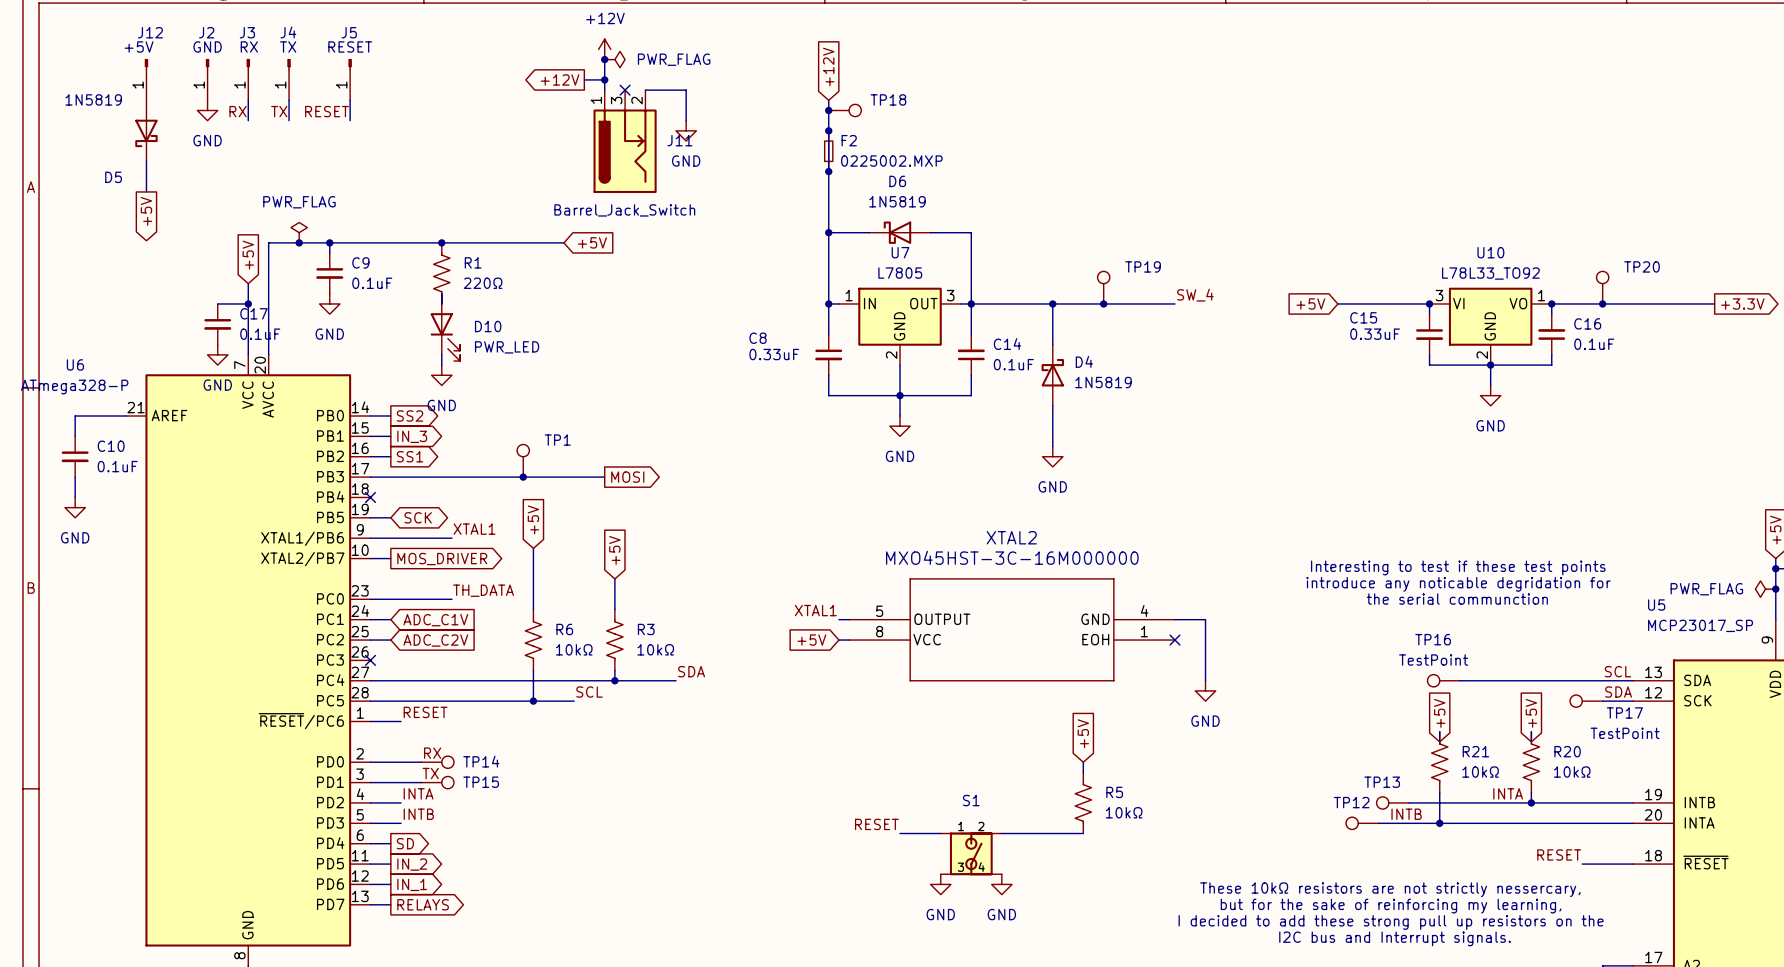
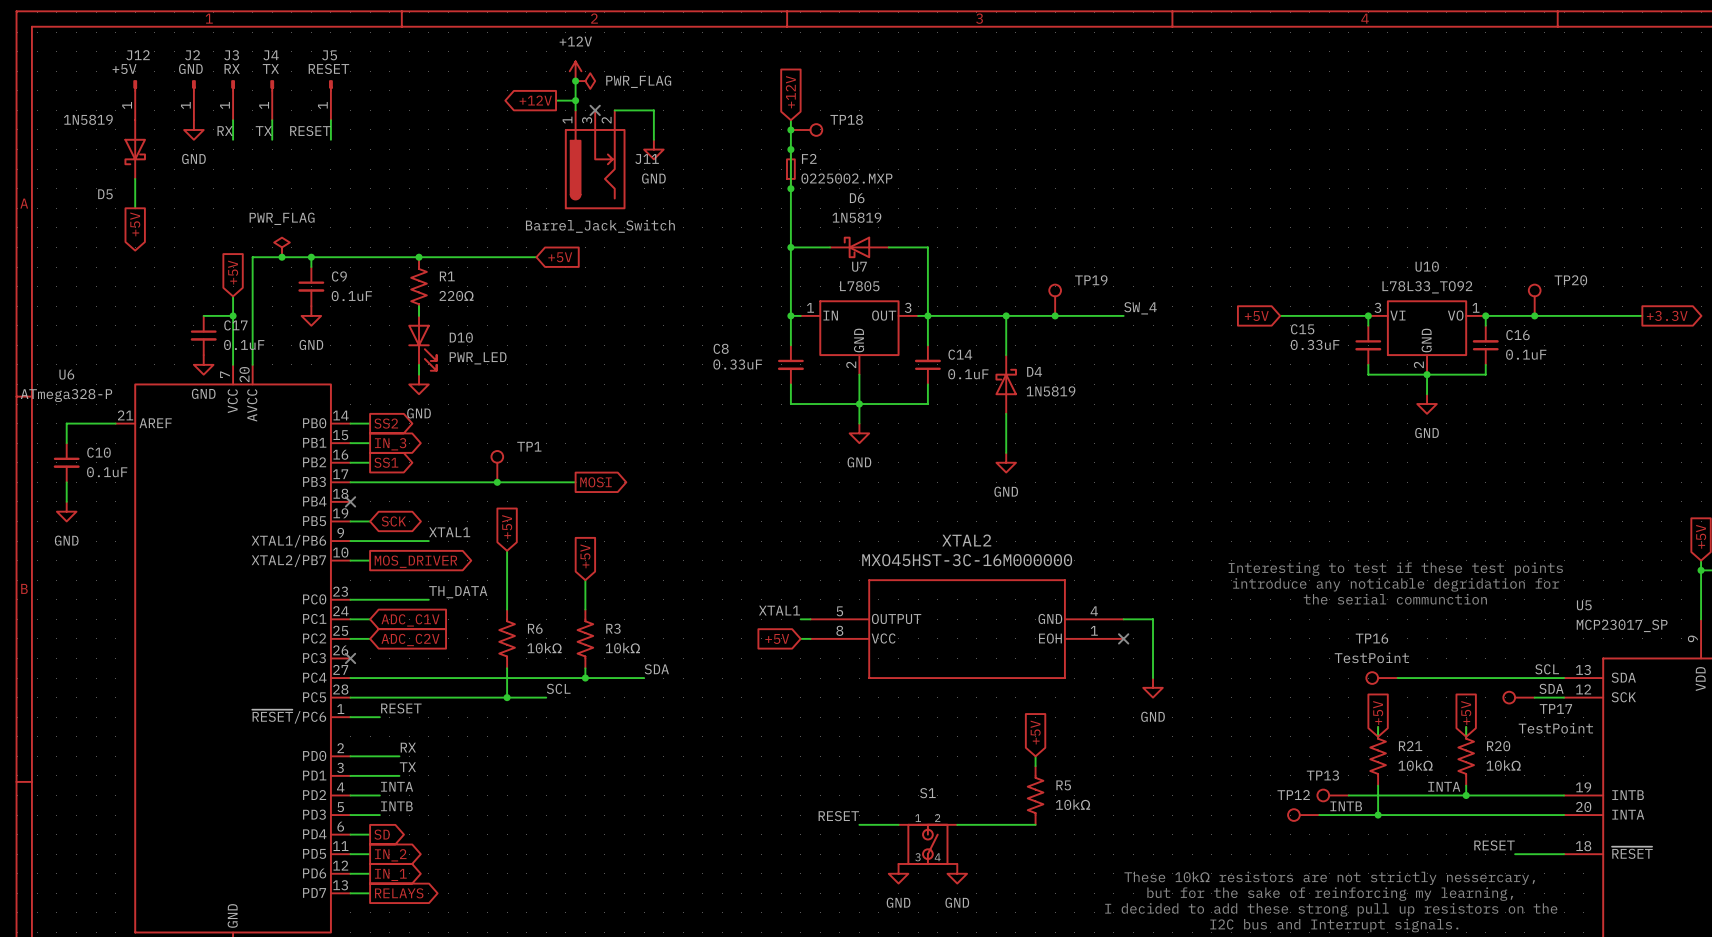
power symbol: PWR_FLAG (1765, 589) -> none
junction: (1775, 589) -> none
TP14: (437, 762) -> none
TP15: (437, 782) -> none

